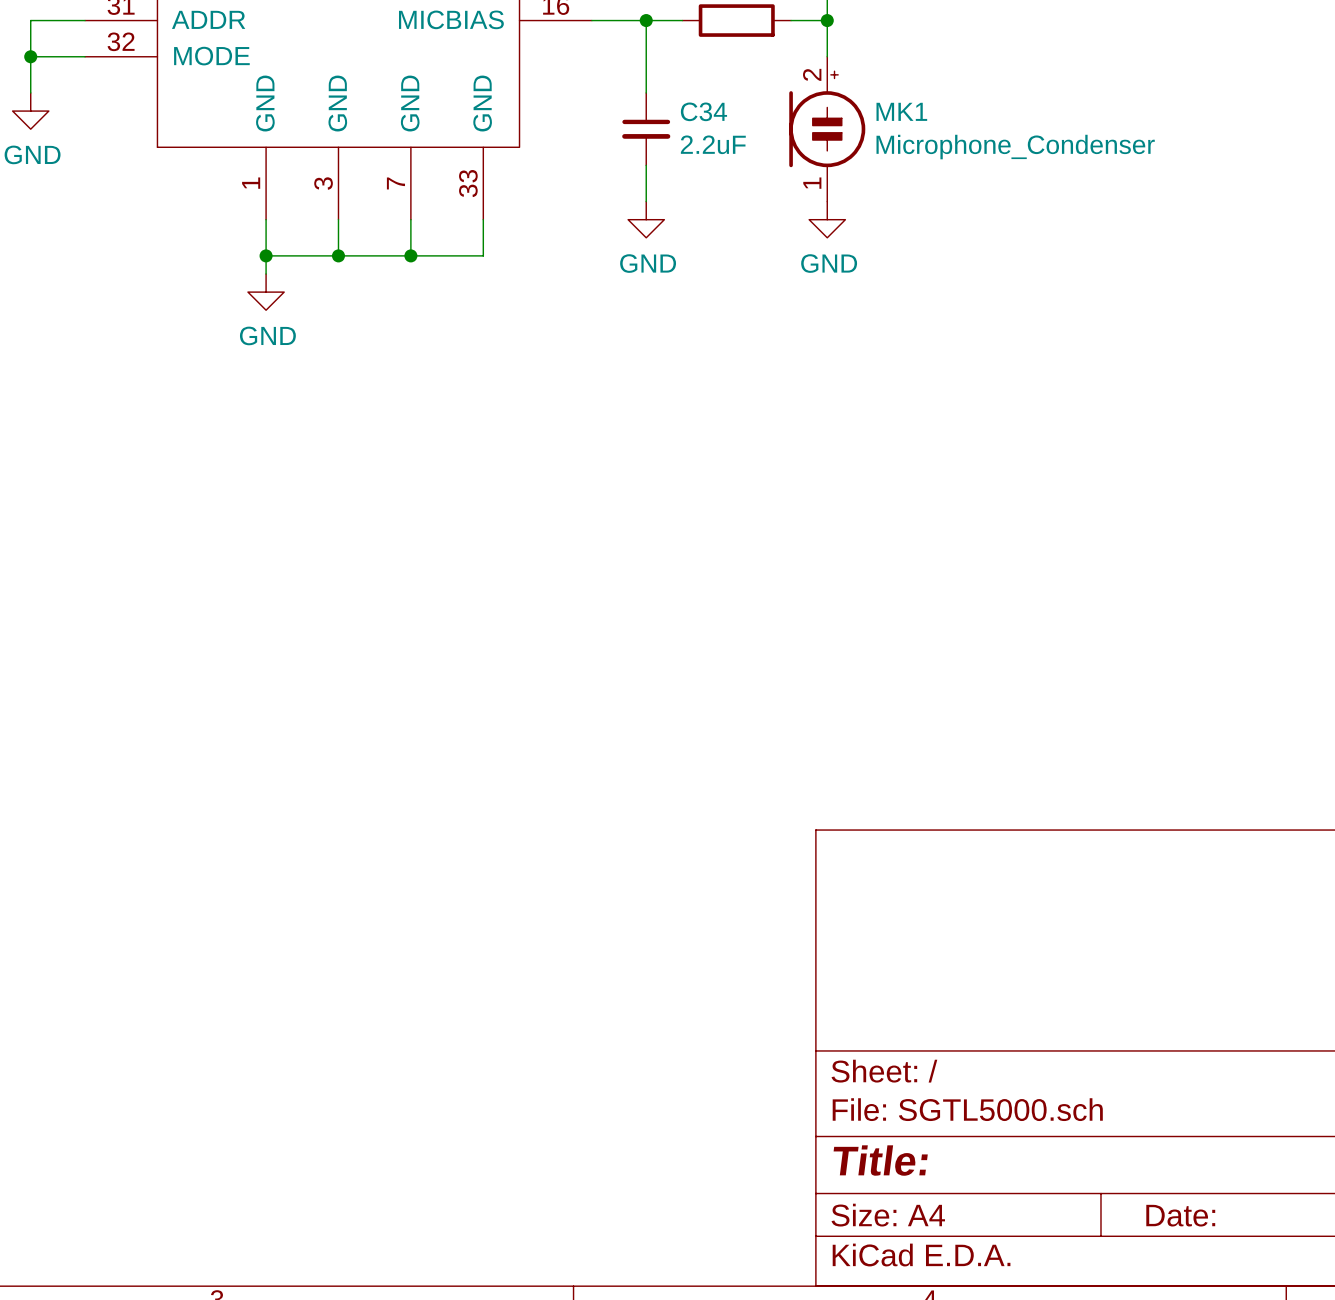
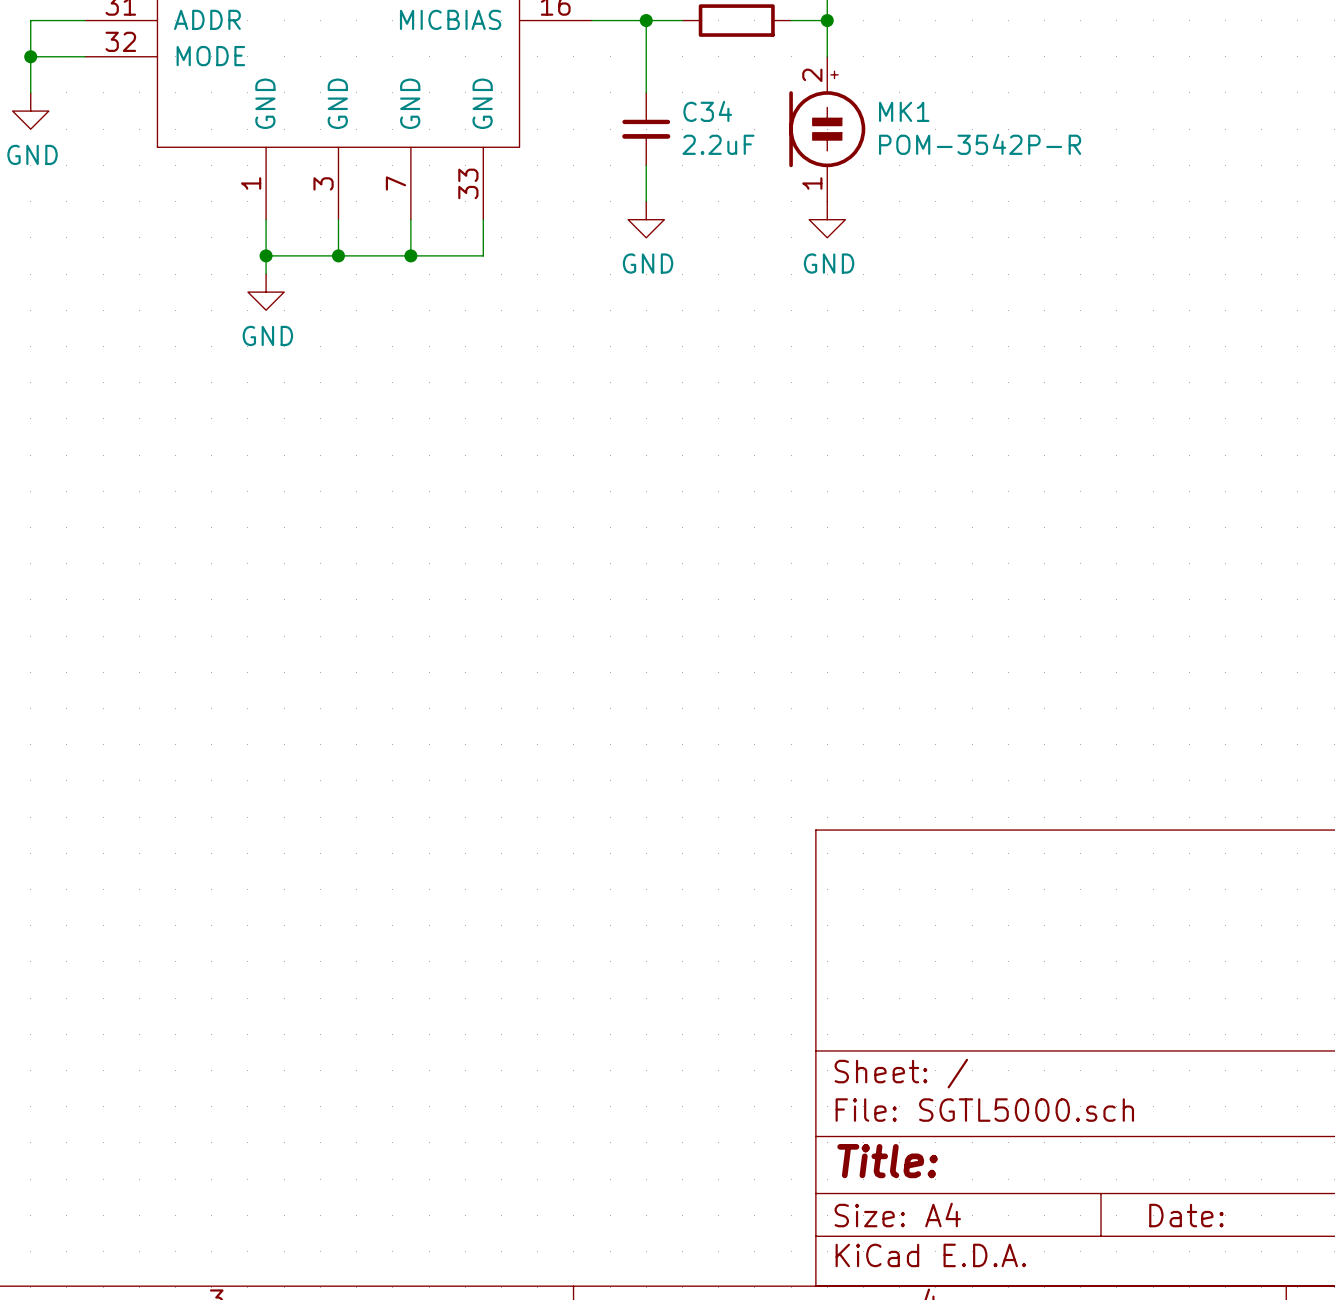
MK1 value: Microphone_Condenser (1015, 147) -> POM-3542P-R (980, 144)

